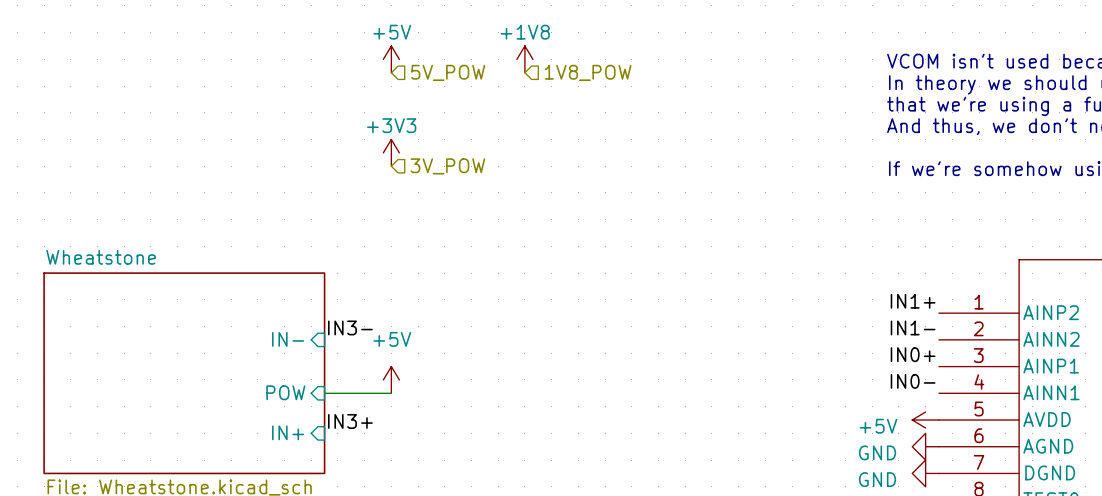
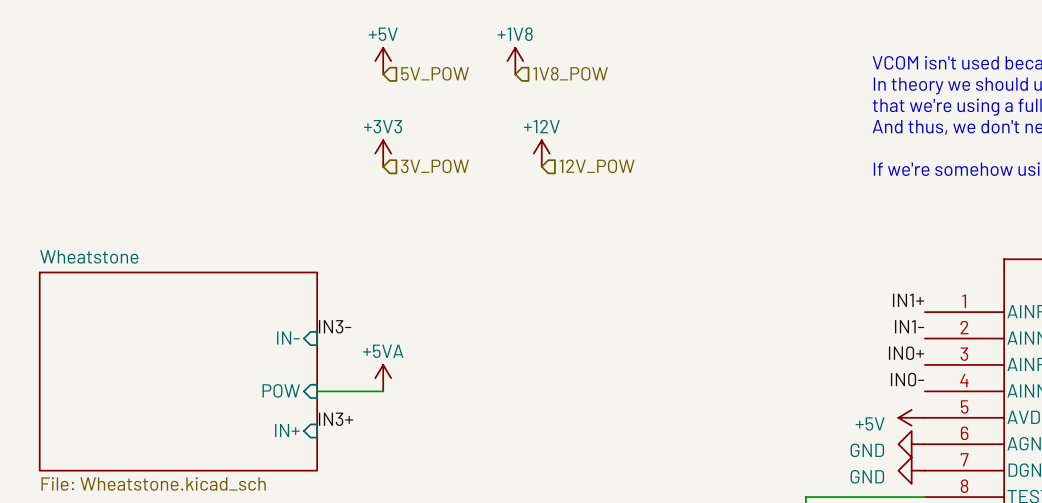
power symbol: none -> +12V (541, 153)
hierarchical label: none -> 12V_POW (597, 166)
power symbol: +5V (391, 379) -> +5VA (383, 378)

